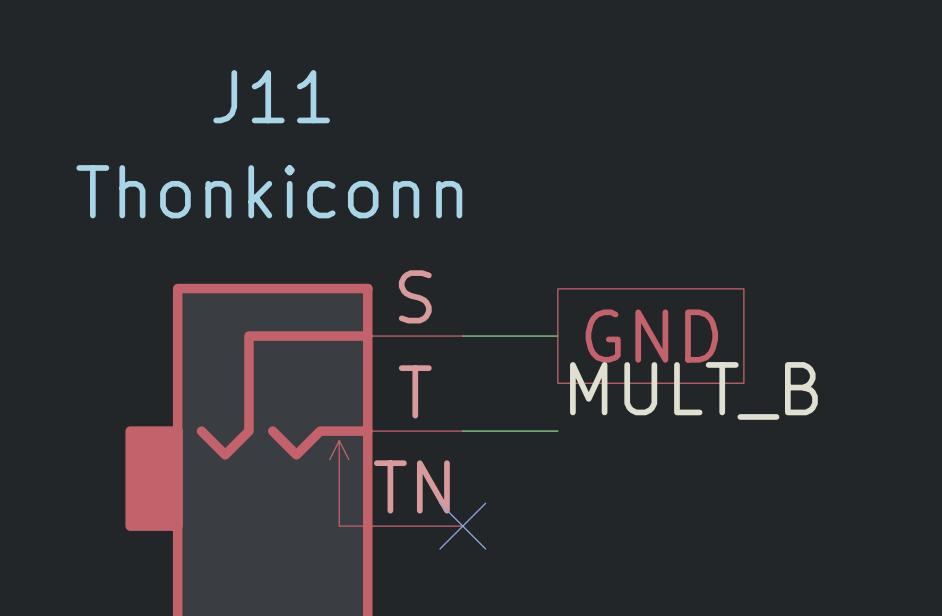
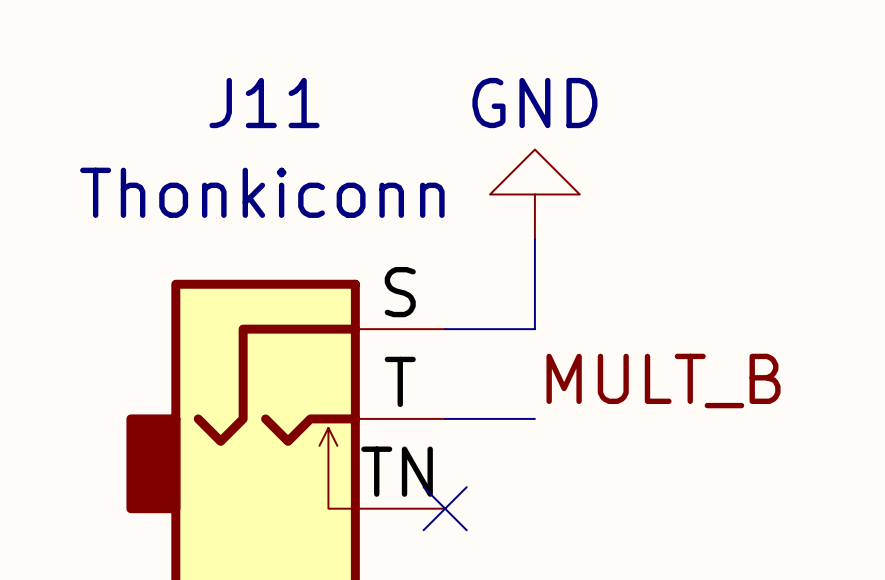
power symbol: none -> GND (534, 194)
wire: none -> (534, 239) (534, 329)
global label: GND (651, 336) -> none

